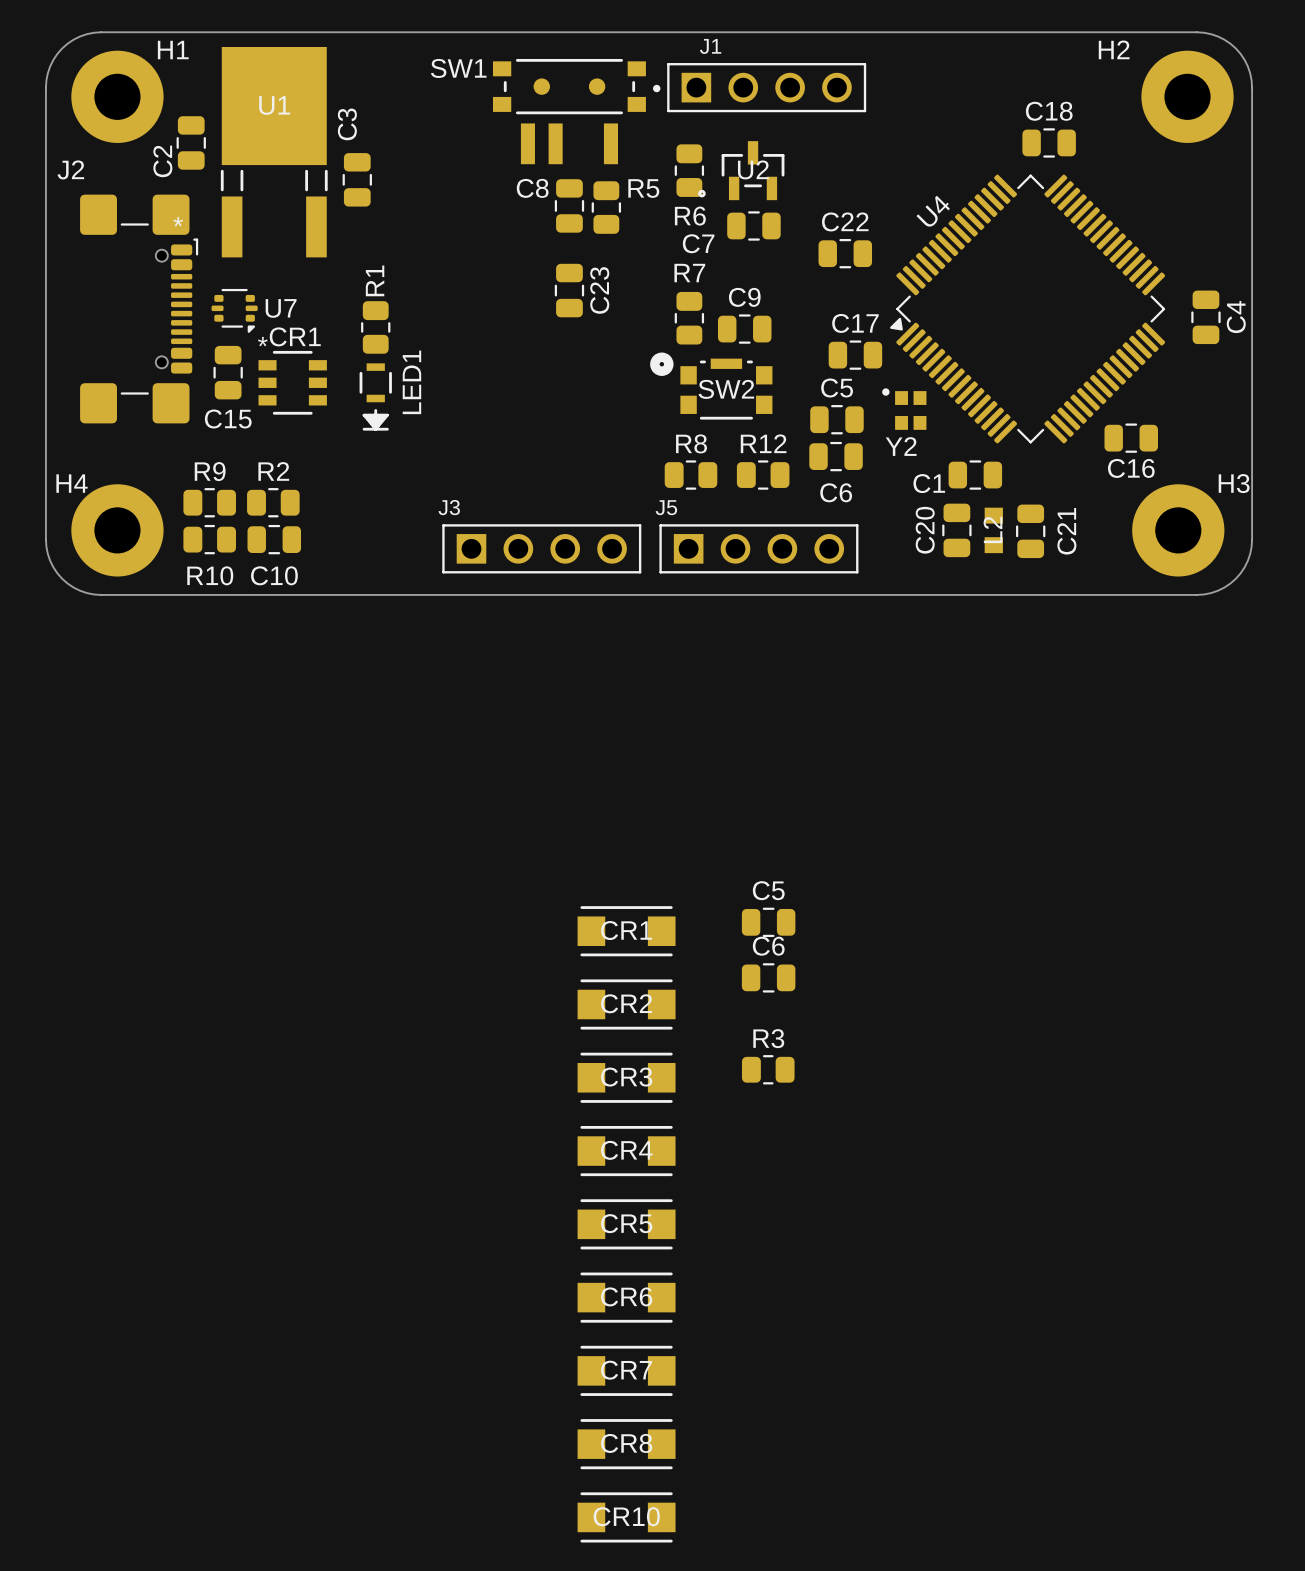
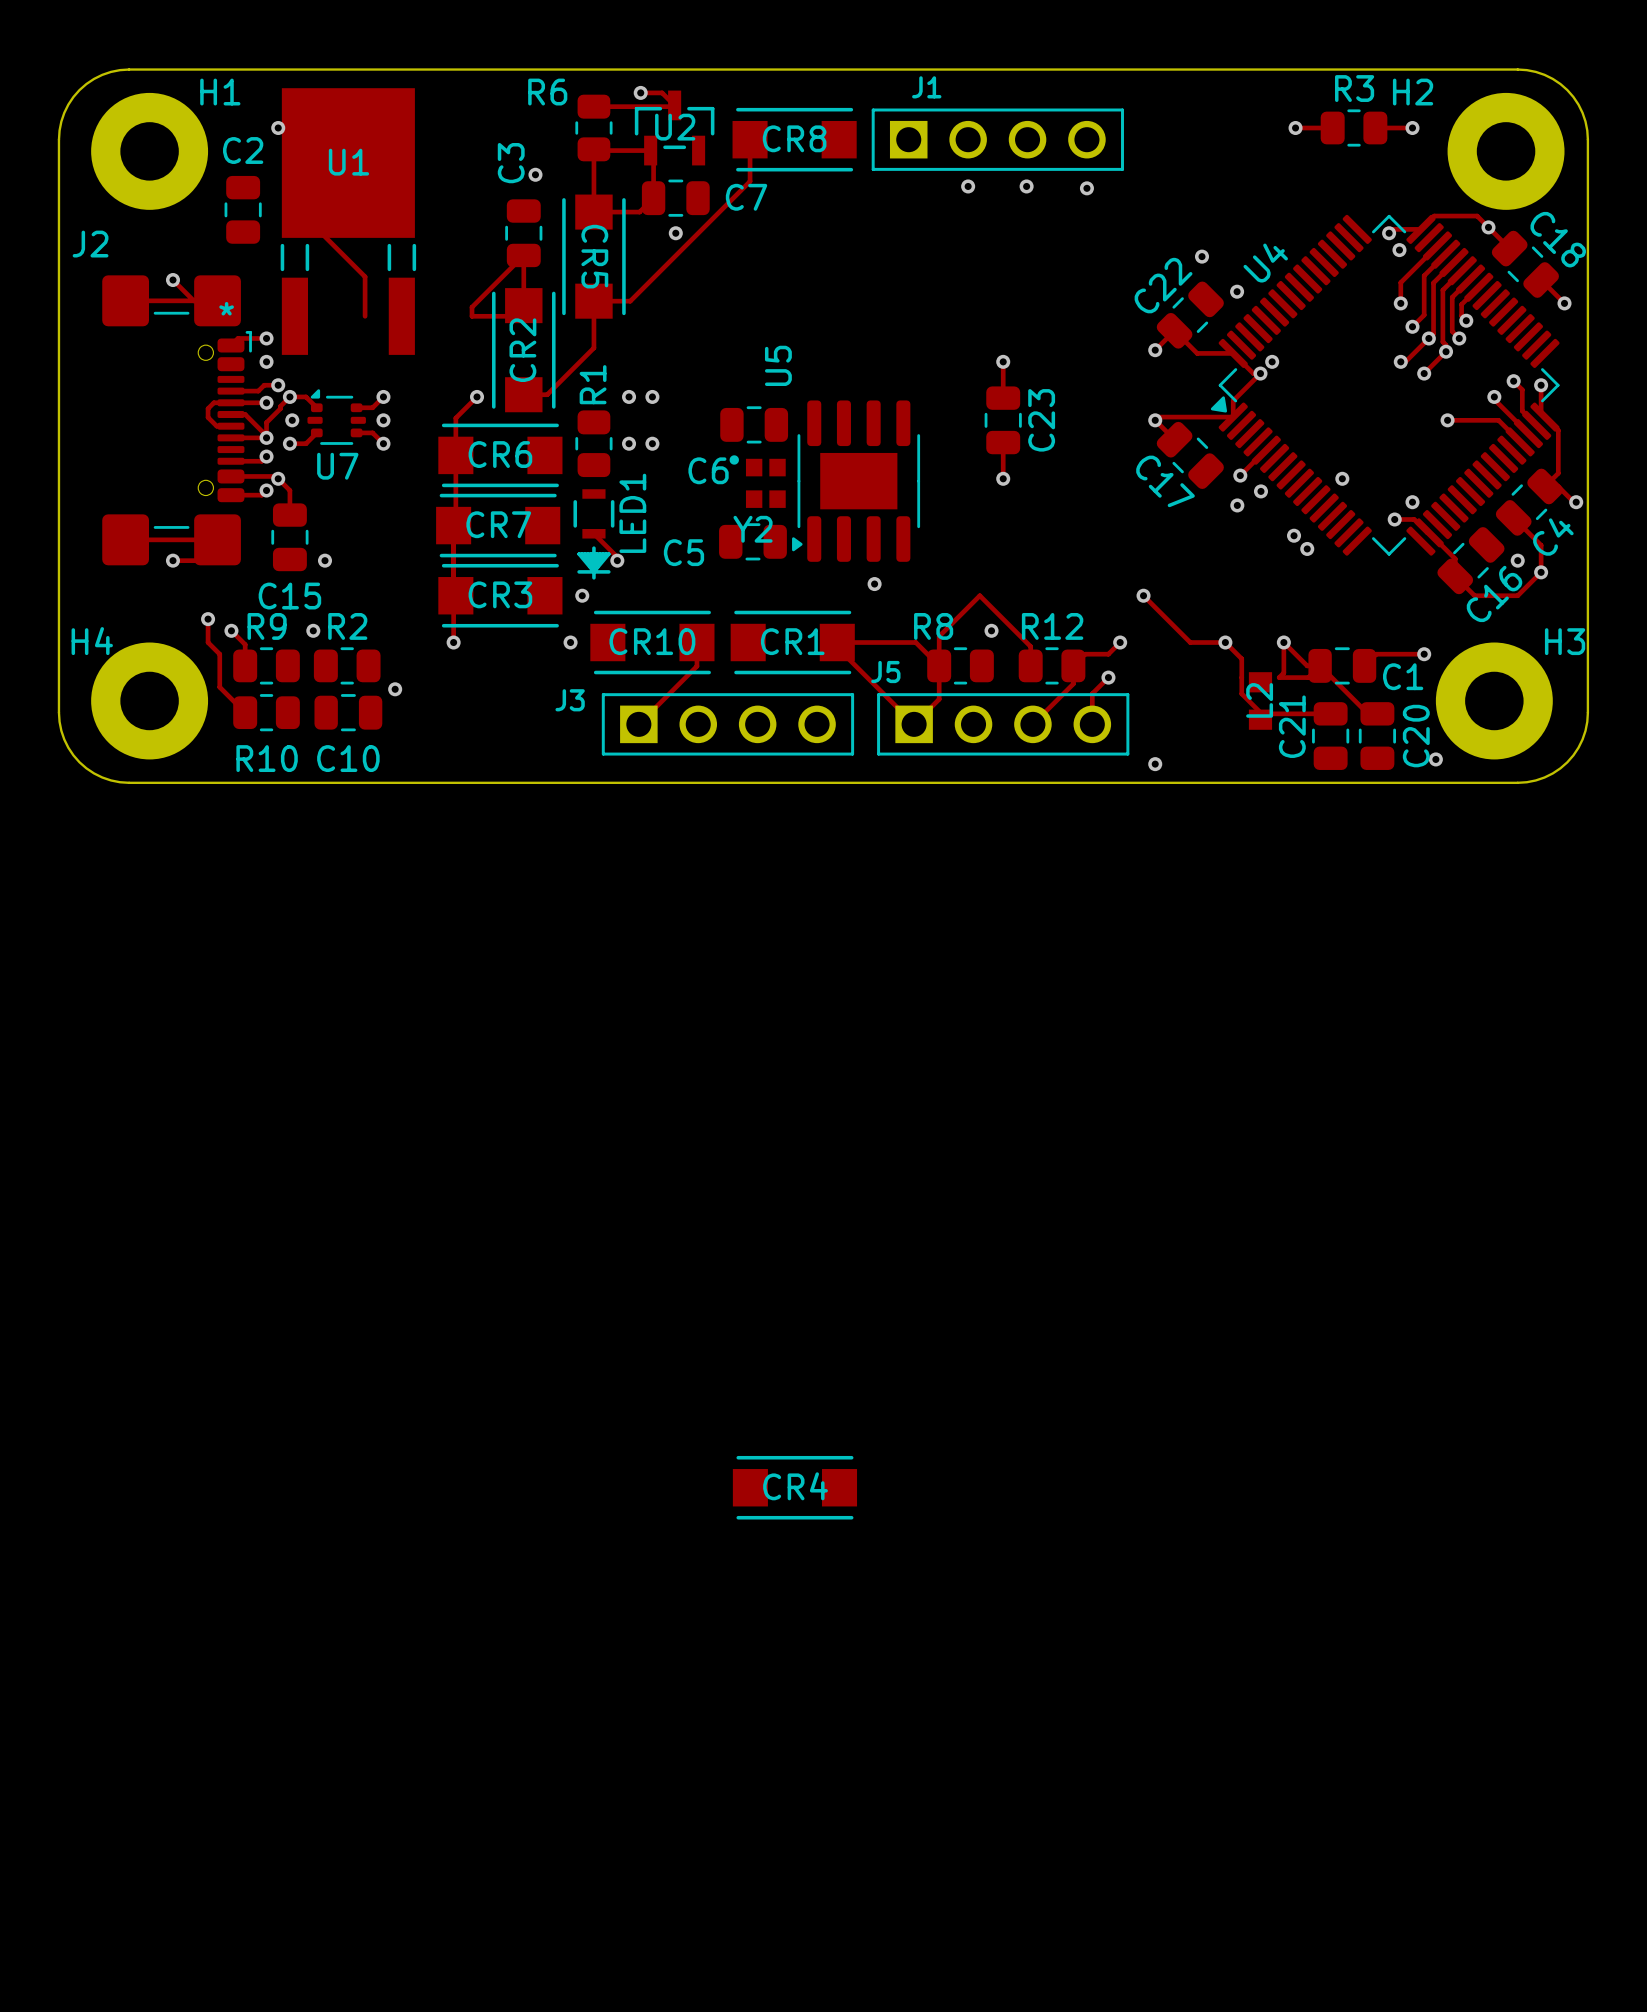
track: none -> (640, 92) (662, 92) (674, 105) (593, 106)
via: none -> (640, 92)
J1 footprint: [653, 63, 867, 113] -> [871, 108, 1124, 171]
via: none -> (278, 128)
track: none -> (1295, 128) (1332, 128)
via: none -> (1295, 128)
track: none -> (1375, 128) (1412, 128)
via: none -> (1412, 128)
track: none -> (750, 139) (750, 181) (630, 301) (593, 301) (593, 347) (547, 394) (523, 394)
track: none -> (593, 149) (593, 212) (639, 212) (653, 198) (653, 153) (650, 150) (593, 149)
SW1: (569, 111) -> none
track: none -> (313, 173) (301, 185) (301, 223) (312, 223) (365, 276) (365, 316)
via: none -> (535, 174)
via: none -> (968, 186)
via: none -> (1026, 186)
via: none -> (1086, 188)
U2 footprint: [698, 141, 785, 201] -> [634, 90, 715, 166]
C18 rotation: 0° (1049, 142) -> 45° clockwise (1525, 264)
C18 position: (1049, 142) -> (1525, 264)
via: none -> (1488, 227)
C2 name rotation: 0° (162, 161) -> 90° clockwise (243, 150)
C2 name position: C2 (162, 161) -> C2 (243, 150)
via: none -> (675, 233)
track: none -> (1389, 233) (1392, 229) (1420, 229) (1434, 216) (1477, 216) (1509, 248)
via: none -> (1389, 233)
R6 position: (689, 170) -> (593, 128)
track: none -> (1437, 245) (1400, 282) (1400, 303)
via: none -> (1399, 250)
track: none -> (1445, 254) (1424, 275) (1424, 315) (1412, 326)
track: none -> (523, 255) (472, 307) (472, 316) (513, 316) (523, 305) (523, 255)
C3 position: (357, 179) -> (523, 233)
via: none -> (1202, 256)
track: none -> (1454, 262) (1433, 282) (1433, 333) (1405, 361) (1400, 361)
track: none -> (1462, 270) (1442, 290) (1442, 341) (1446, 345) (1446, 351) (1424, 373)
track: none -> (1470, 279) (1452, 297) (1452, 331) (1459, 338)
track: none -> (172, 280) (193, 300)
via: none -> (172, 280)
track: none -> (1541, 280) (1564, 303)
track: none -> (1478, 287) (1461, 304) (1461, 316) (1466, 320)
C8: (569, 205) -> none
R5: (606, 207) -> none
via: none -> (1237, 291)
track: none -> (125, 300) (217, 300)
R6 name position: R6 (690, 216) -> R6 (547, 92)
via: none -> (1400, 303)
via: none -> (1564, 303)
C7 position: (753, 225) -> (675, 198)
via: none -> (1466, 320)
via: none -> (1412, 326)
C7 name position: C7 (698, 243) -> C7 (746, 197)
track: none -> (266, 338) (238, 338) (230, 345)
via: none -> (266, 338)
via: none -> (1428, 338)
via: none -> (1459, 338)
C22 rotation: 0° (845, 253) -> 45° counterclockwise (1190, 315)
C22 position: (845, 253) -> (1190, 315)
track: none -> (1155, 350) (1174, 330) (1197, 353) (1233, 353) (1253, 373) (1260, 373) (1233, 400) (1233, 417) (1158, 417) (1155, 420) (1174, 439)
via: none -> (1155, 350)
via: none -> (1446, 351)
via: none -> (266, 361)
track: none -> (1003, 361) (1003, 398)
via: none -> (1003, 361)
via: none -> (1272, 361)
via: none -> (1400, 361)
via: none -> (1260, 373)
via: none -> (1424, 373)
track: none -> (1513, 381) (1522, 389) (1522, 410) (1536, 425)
via: none -> (1513, 381)
track: none -> (278, 385) (264, 385) (258, 391) (230, 391)
via: none -> (278, 385)
track: none -> (1541, 385) (1541, 413) (1558, 430) (1558, 473) (1545, 486) (1558, 486) (1573, 502)
via: none -> (1541, 385)
via: none -> (289, 396)
track: none -> (383, 396) (372, 407) (356, 407)
via: none -> (383, 396)
track: none -> (477, 396) (455, 418) (453, 642)
via: none -> (477, 396)
via: none -> (629, 396)
via: none -> (652, 396)
C23 position: (569, 290) -> (1003, 420)
track: none -> (1494, 396) (1494, 399) (1528, 433)
via: none -> (1494, 396)
track: none -> (266, 402) (213, 402) (208, 408) (208, 417) (216, 426) (230, 426)
via: none -> (266, 402)
track: none -> (316, 407) (305, 396) (289, 396) (266, 422) (266, 437) (230, 437)
track: none -> (230, 414) (245, 414) (266, 435)
U7 name position: U7 (281, 308) -> U7 (337, 466)
via: none -> (292, 420)
via: none -> (383, 420)
via: none -> (1155, 420)
U4 position: (1027, 309) -> (1385, 385)
track: none -> (1447, 420) (1498, 420) (1520, 441)
via: none -> (1447, 420)
U7 rotation: 0° (234, 310) -> 180° (336, 417)
U7 position: (234, 310) -> (336, 417)
C4 rotation: 0° (1205, 317) -> 45° clockwise (1529, 502)
C4 position: (1205, 317) -> (1529, 502)
track: none -> (316, 432) (305, 443) (289, 443)
track: none -> (356, 432) (372, 432) (383, 443)
R7: (689, 318) -> none
via: none -> (266, 437)
C17 name position: C17 (855, 323) -> C17 (1165, 481)
track: none -> (1003, 442) (1003, 478)
via: none -> (289, 443)
via: none -> (383, 443)
R1 position: (375, 327) -> (593, 443)
via: none -> (629, 443)
via: none -> (652, 443)
C9: (744, 329) -> none
track: none -> (266, 456) (261, 461) (230, 461)
via: none -> (266, 456)
track: none -> (1257, 458) (1240, 475)
via: none -> (1240, 475)
track: none -> (230, 476) (275, 476) (289, 490) (289, 515)
via: none -> (278, 478)
via: none -> (1003, 478)
C17 rotation: 0° (855, 355) -> 45° clockwise (1190, 455)
C17 position: (855, 355) -> (1190, 455)
via: none -> (1342, 478)
U5: none -> (856, 481)
LED1 footprint: [359, 363, 392, 431] -> [573, 489, 615, 580]
track: none -> (266, 490) (261, 495) (230, 495)
via: none -> (266, 490)
via: none -> (1260, 491)
C15 position: (228, 372) -> (289, 537)
via: none -> (1412, 502)
via: none -> (1576, 502)
via: none -> (1237, 505)
CR1: (292, 382) -> none
track: none -> (1513, 517) (1541, 545) (1541, 572) (1517, 595) (1474, 595) (1455, 576) (1455, 558) (1429, 532) (1414, 519) (1394, 519)
SW2: (711, 386) -> none
via: none -> (1394, 519)
C5 name position: C5 (837, 388) -> C5 (683, 552)
track: none -> (593, 533) (617, 557) (617, 560)
via: none -> (1294, 535)
track: none -> (125, 539) (217, 539) (196, 560) (172, 560)
Y2 position: (904, 409) -> (757, 481)
via: none -> (1307, 548)
via: none -> (172, 560)
via: none -> (325, 560)
via: none -> (617, 560)
C5 position: (836, 419) -> (752, 541)
via: none -> (1517, 560)
via: none -> (1541, 572)
via: none -> (874, 584)
C16 rotation: 0° (1131, 438) -> 45° counterclockwise (1470, 560)
C16 position: (1131, 438) -> (1470, 560)
R8 name position: R8 (691, 443) -> R8 (933, 626)
via: none -> (582, 595)
track: none -> (1143, 595) (1190, 642) (1225, 642) (1241, 658) (1241, 693) (1261, 713) (1330, 713)
via: none -> (1143, 595)
C6 position: (836, 456) -> (754, 424)
track: none -> (208, 619) (208, 642) (219, 654) (219, 687) (245, 712)
via: none -> (208, 619)
track: none -> (231, 630) (245, 644) (245, 665)
via: none -> (231, 630)
via: none -> (313, 630)
R8 position: (690, 475) -> (960, 665)
R12 position: (763, 475) -> (1052, 665)
via: none -> (991, 630)
C1 position: (975, 475) -> (1342, 665)
C1 name position: C1 (929, 483) -> C1 (1403, 676)
via: none -> (453, 642)
via: none -> (570, 642)
track: none -> (696, 642) (696, 666) (638, 724)
track: none -> (1120, 642) (1108, 654) (1085, 654) (1073, 665) (1073, 683) (1032, 724)
via: none -> (1120, 642)
via: none -> (1225, 642)
via: none -> (1283, 642)
C6 name position: C6 (836, 492) -> C6 (708, 470)
track: none -> (1424, 654) (1376, 654) (1364, 665)
via: none -> (1424, 654)
track: none -> (939, 665) (915, 642) (837, 642) (837, 647) (914, 724) (939, 699) (939, 636) (979, 595) (1030, 646) (1030, 665)
track: none -> (1320, 665) (1368, 713) (1377, 713)
track: none -> (1320, 665) (1307, 665) (1283, 642) (1283, 672) (1279, 677) (1308, 677) (1320, 665)
J3 name position: J3 (449, 507) -> J3 (570, 700)
track: none -> (1108, 677) (1092, 693) (1092, 724)
via: none -> (1108, 677)
via: none -> (395, 689)
C20 name position: C20 (925, 530) -> C20 (1416, 736)
C20 position: (956, 530) -> (1377, 736)
C21 position: (1030, 531) -> (1330, 736)
C21 name position: C21 (1066, 531) -> C21 (1292, 726)
J3 position: (541, 548) -> (727, 724)
J5 position: (758, 548) -> (1003, 724)
via: none -> (1435, 759)
via: none -> (1155, 764)
C5: (768, 922) -> none
CR1 position: (626, 931) -> (792, 642)
C6: (768, 977) -> none
CR2 rotation: 0° (626, 1004) -> 90° clockwise (523, 350)
CR2 position: (626, 1004) -> (523, 350)
R3 position: (768, 1069) -> (1354, 128)
CR3 position: (626, 1077) -> (500, 595)
CR5 rotation: 0° (626, 1224) -> 90° clockwise (593, 256)
CR5 position: (626, 1224) -> (593, 256)
CR6 position: (626, 1297) -> (500, 455)
CR7 position: (626, 1370) -> (498, 525)
CR8 position: (626, 1444) -> (794, 139)
CR10 position: (626, 1517) -> (652, 642)

